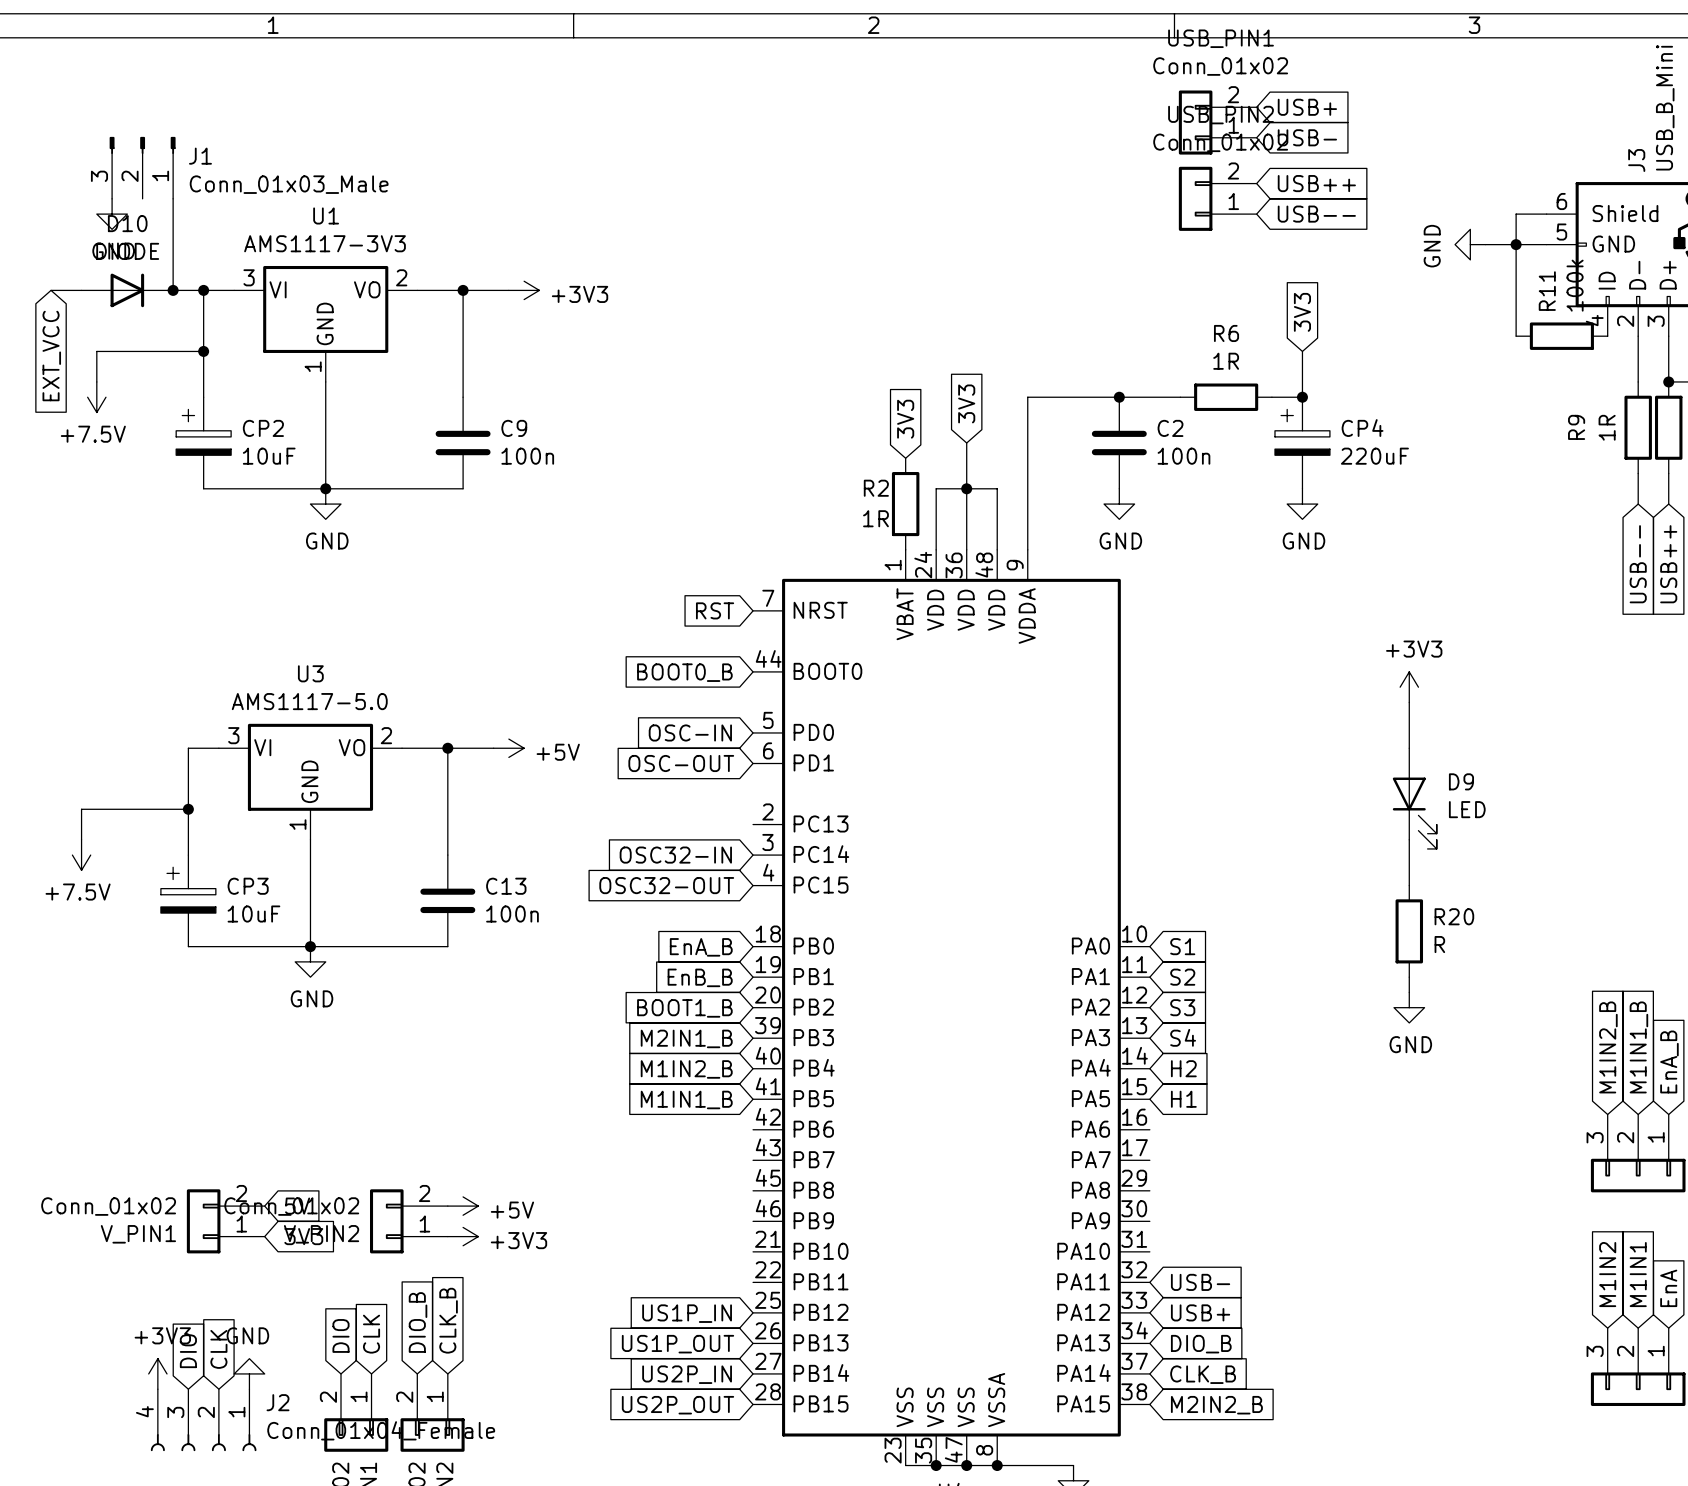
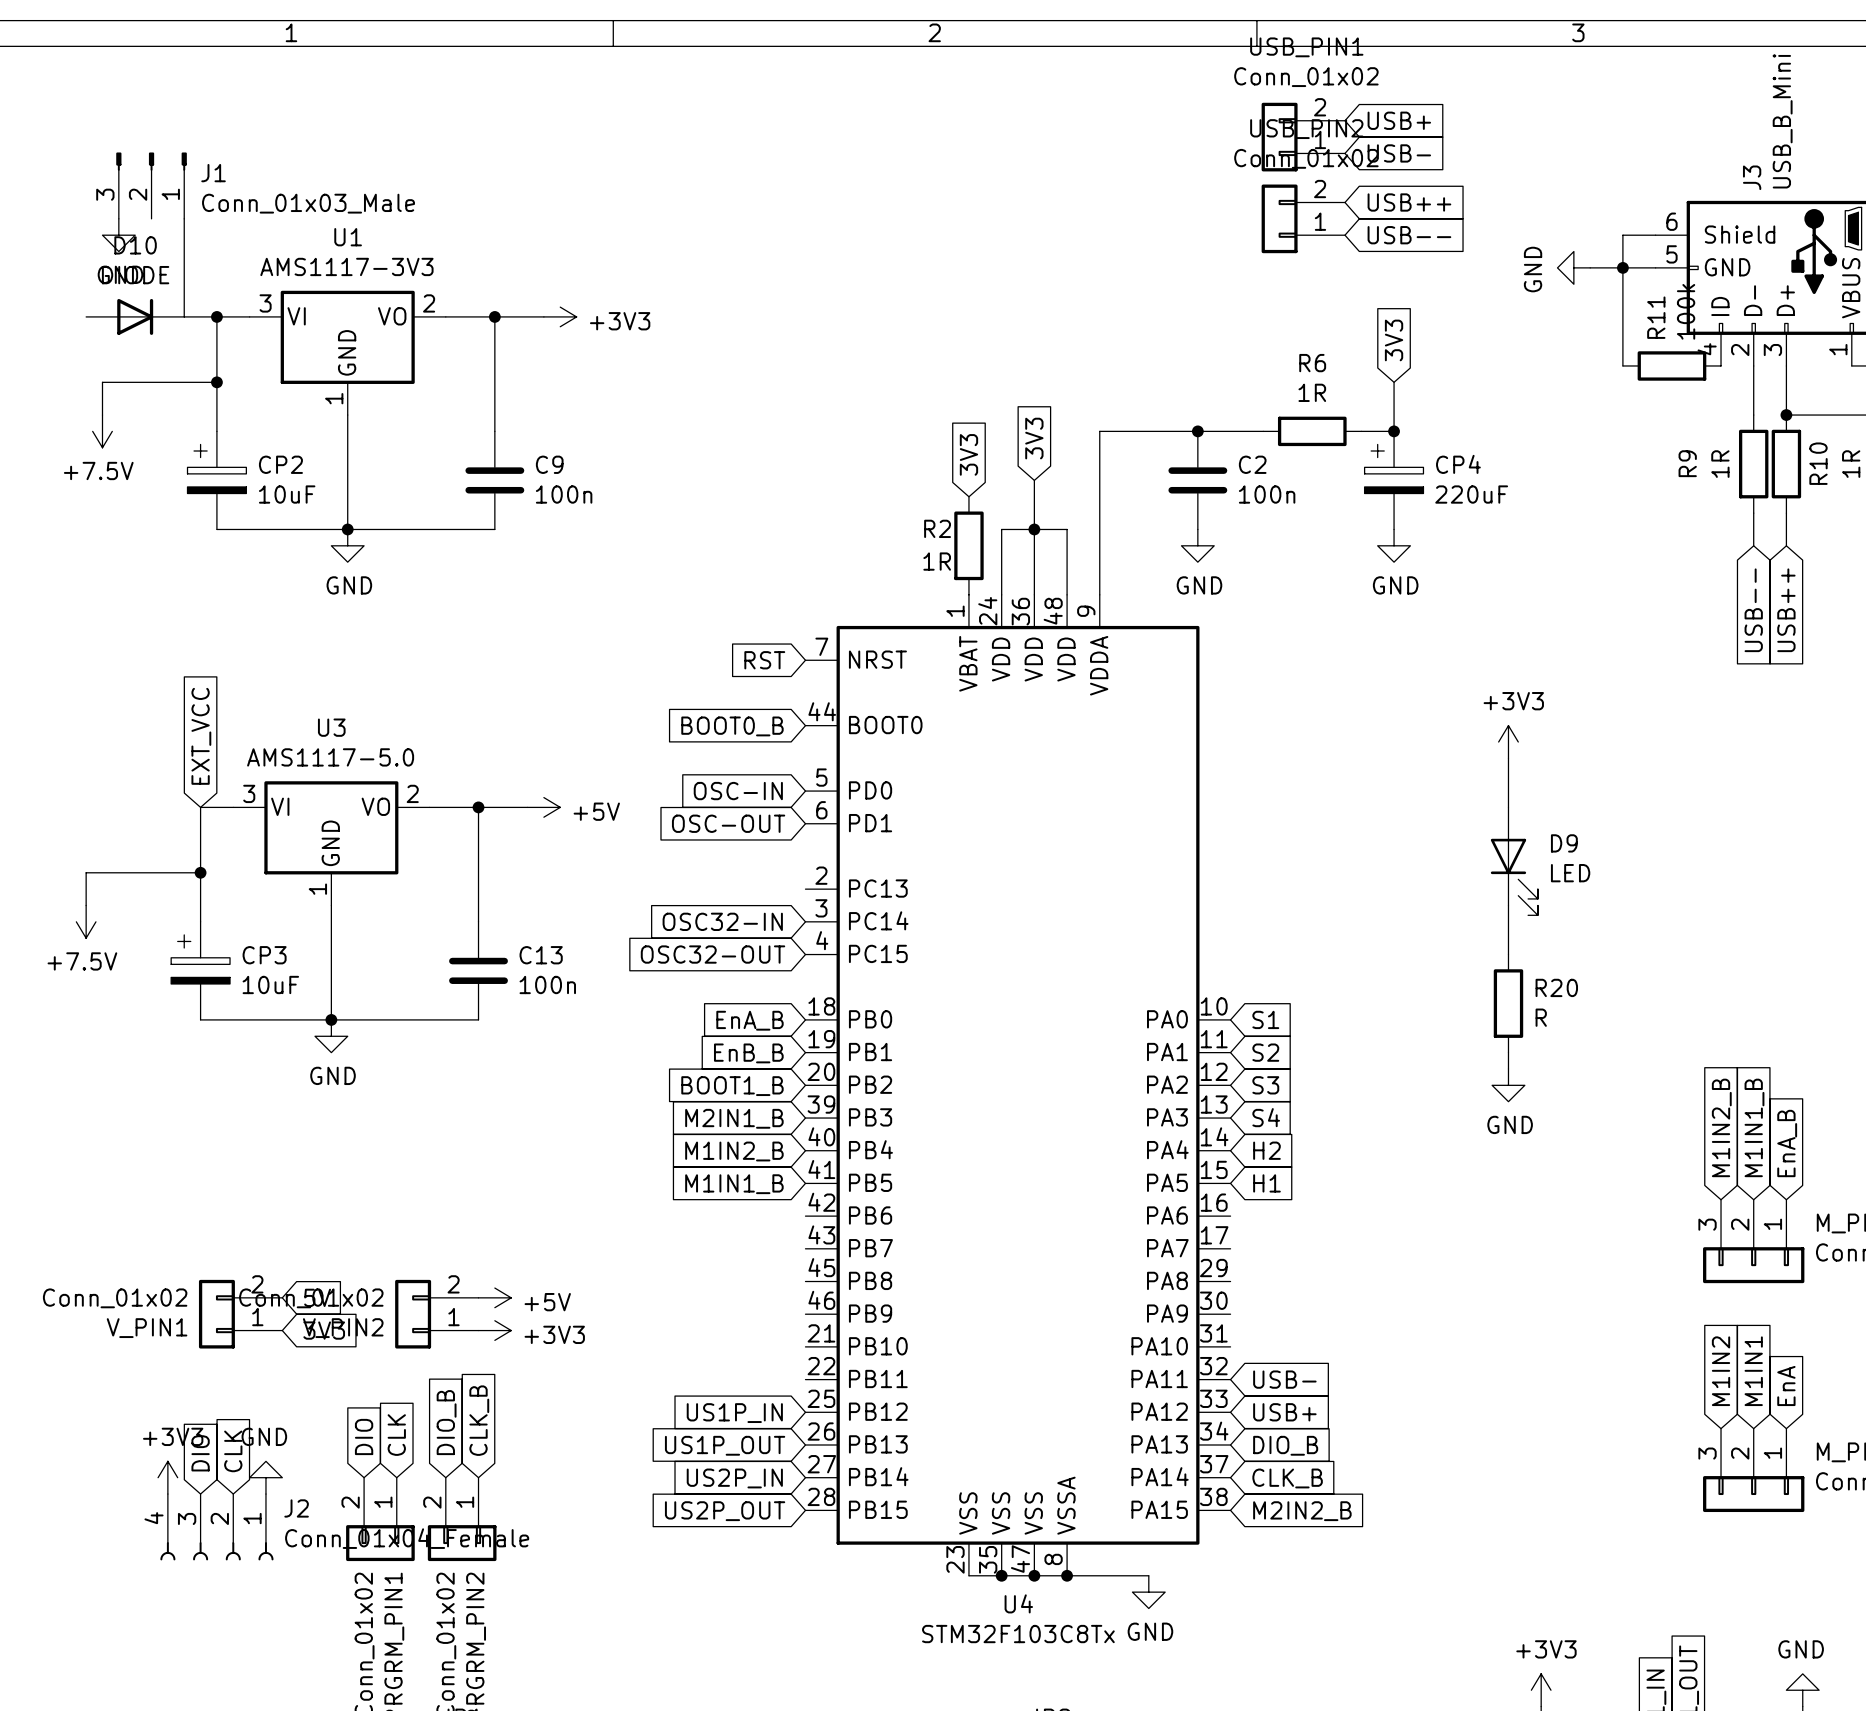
wire: (51, 290) (81, 290) -> none
junction: (173, 290) -> none
global label: EXT_VCC (51, 356) -> none
global label: none -> EXT_VCC (201, 736)

